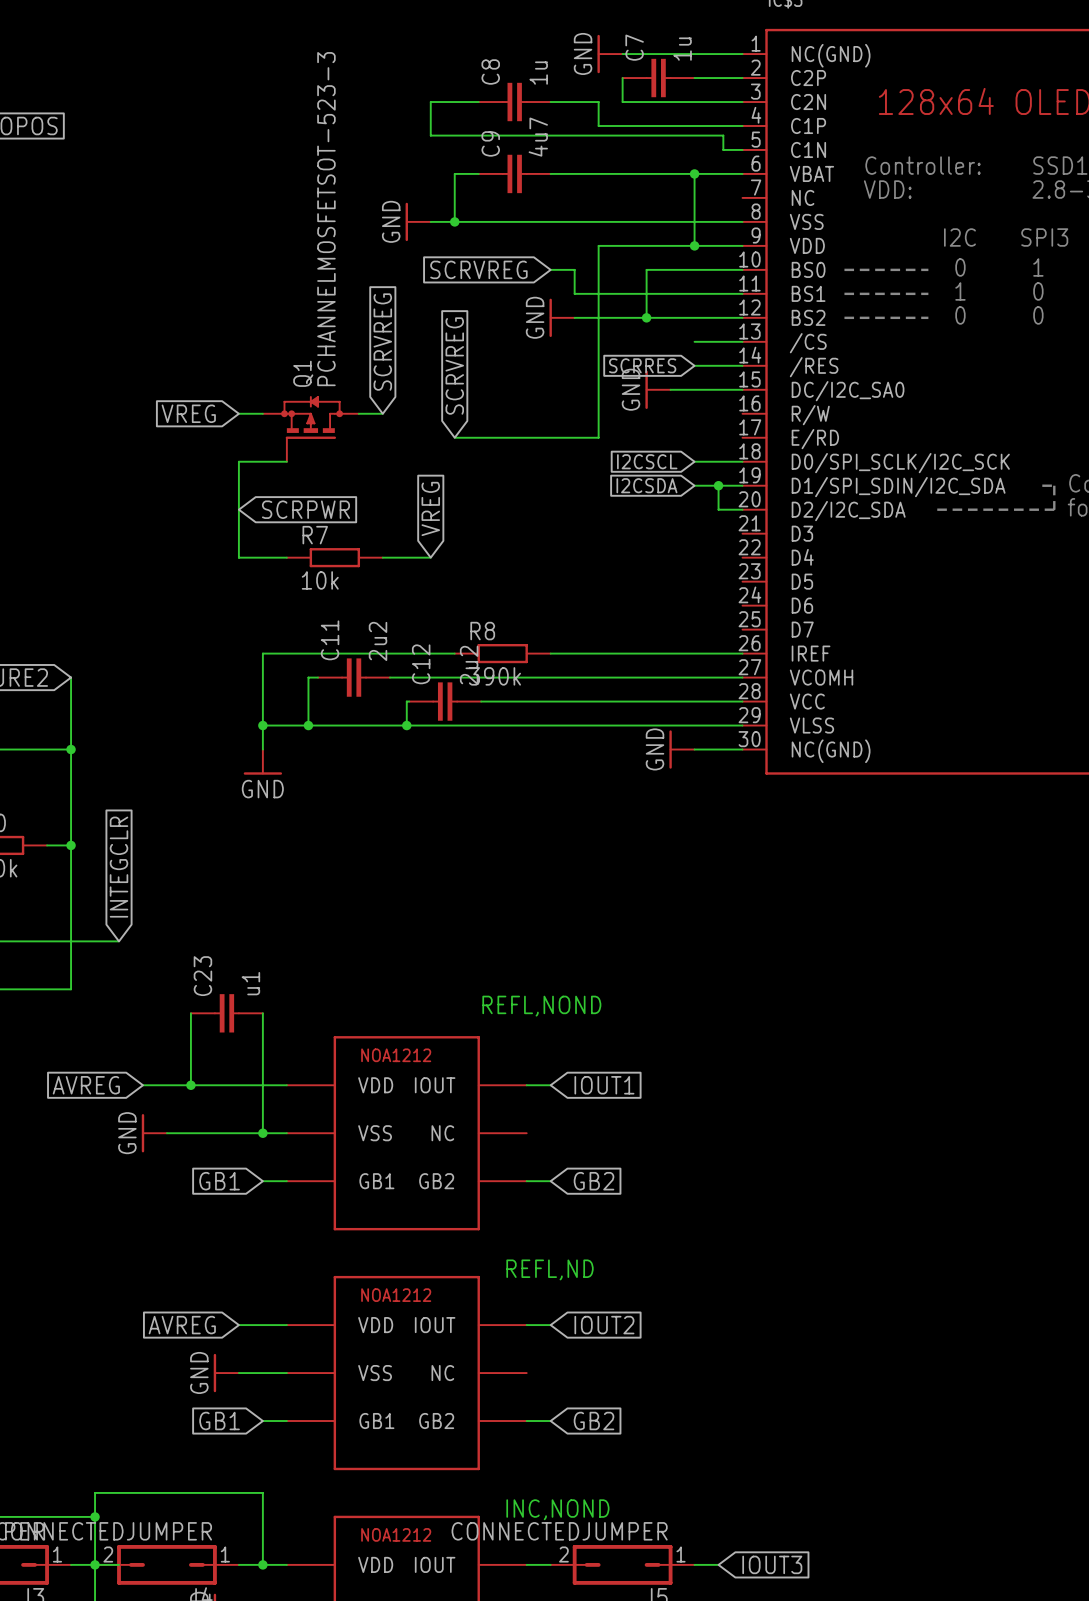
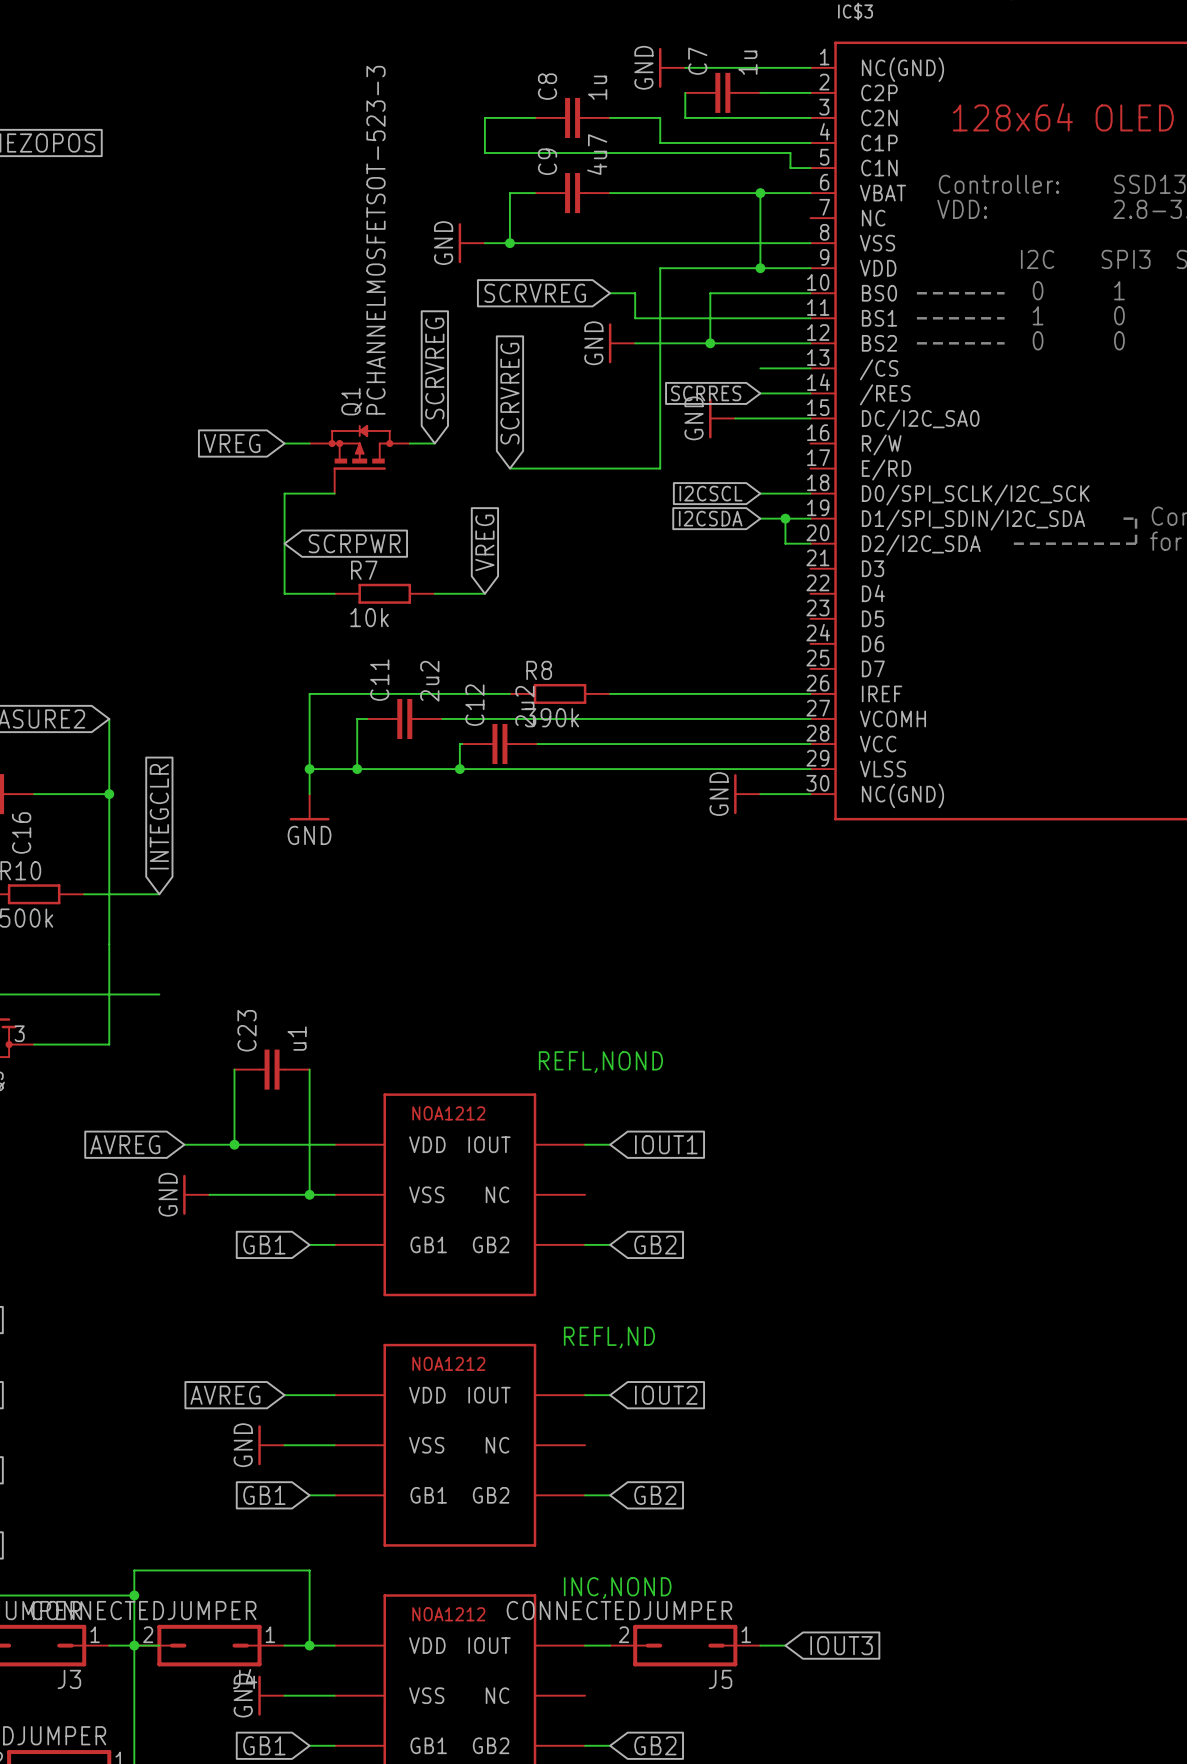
wire: none -> (109, 894) (159, 894)
junction: (71, 845) -> none
global label position: INTEGCLR (119, 867) -> INTEGCLR (159, 816)

